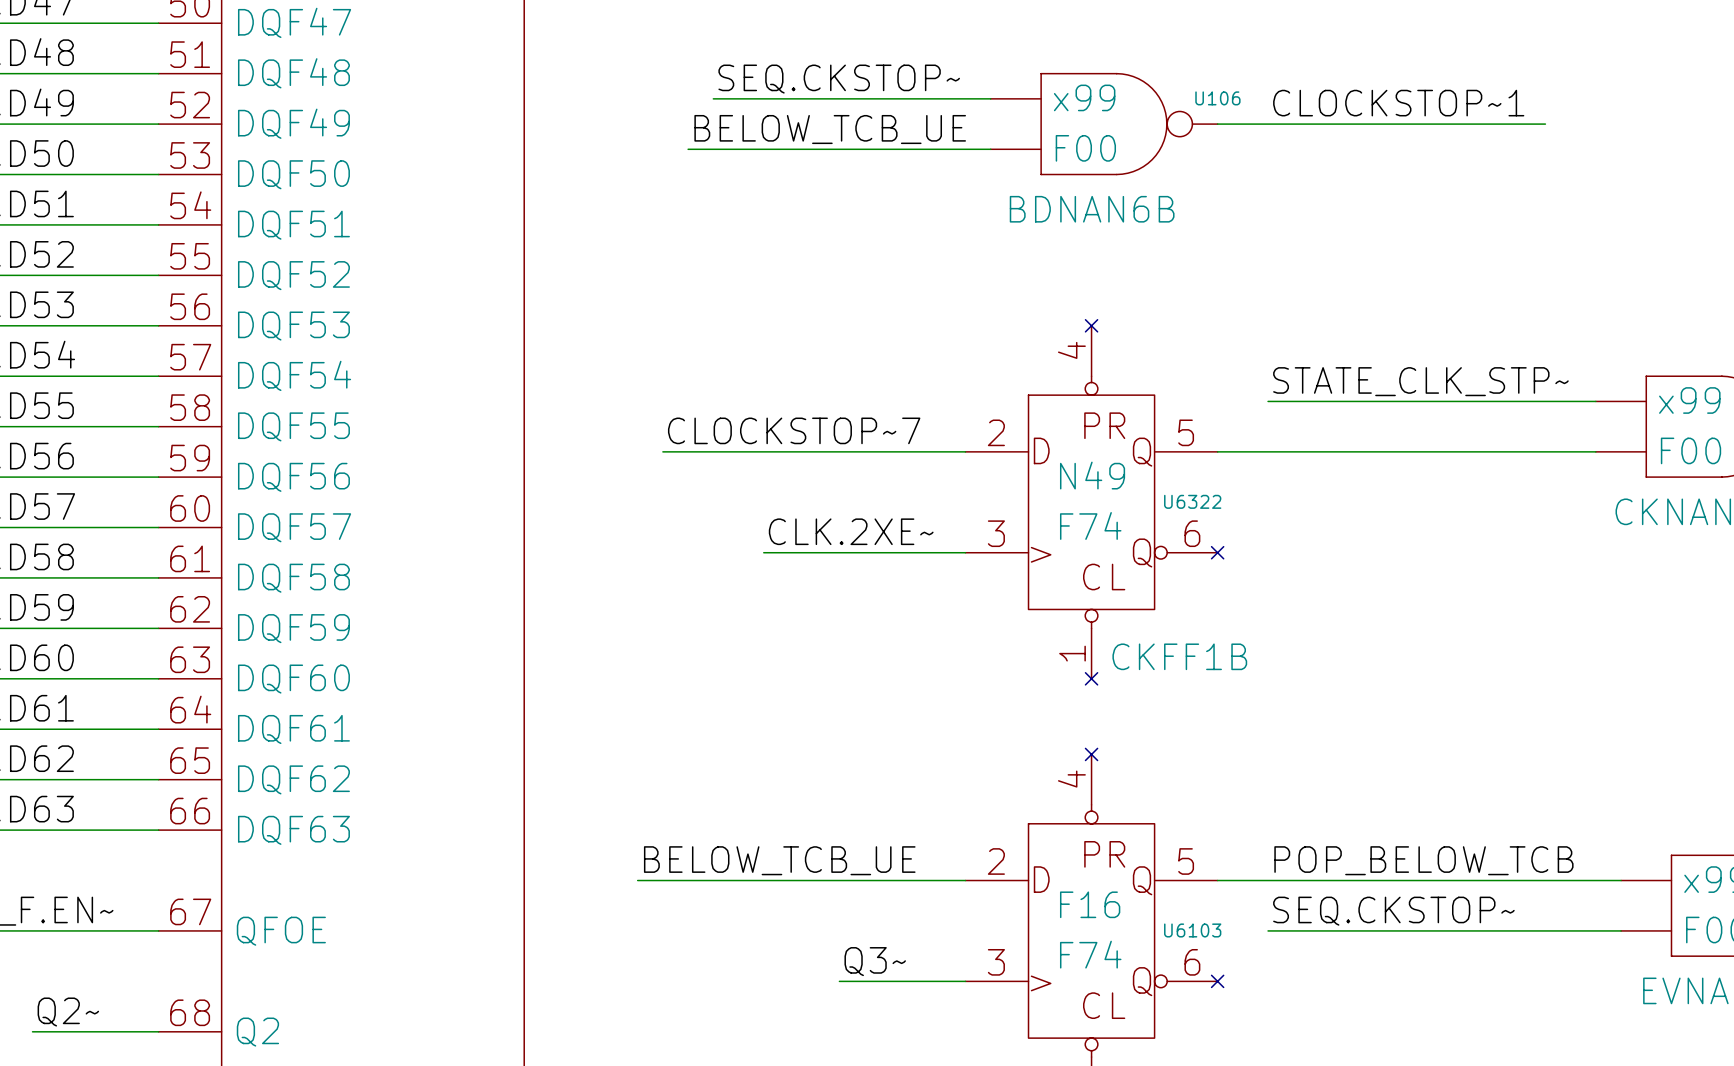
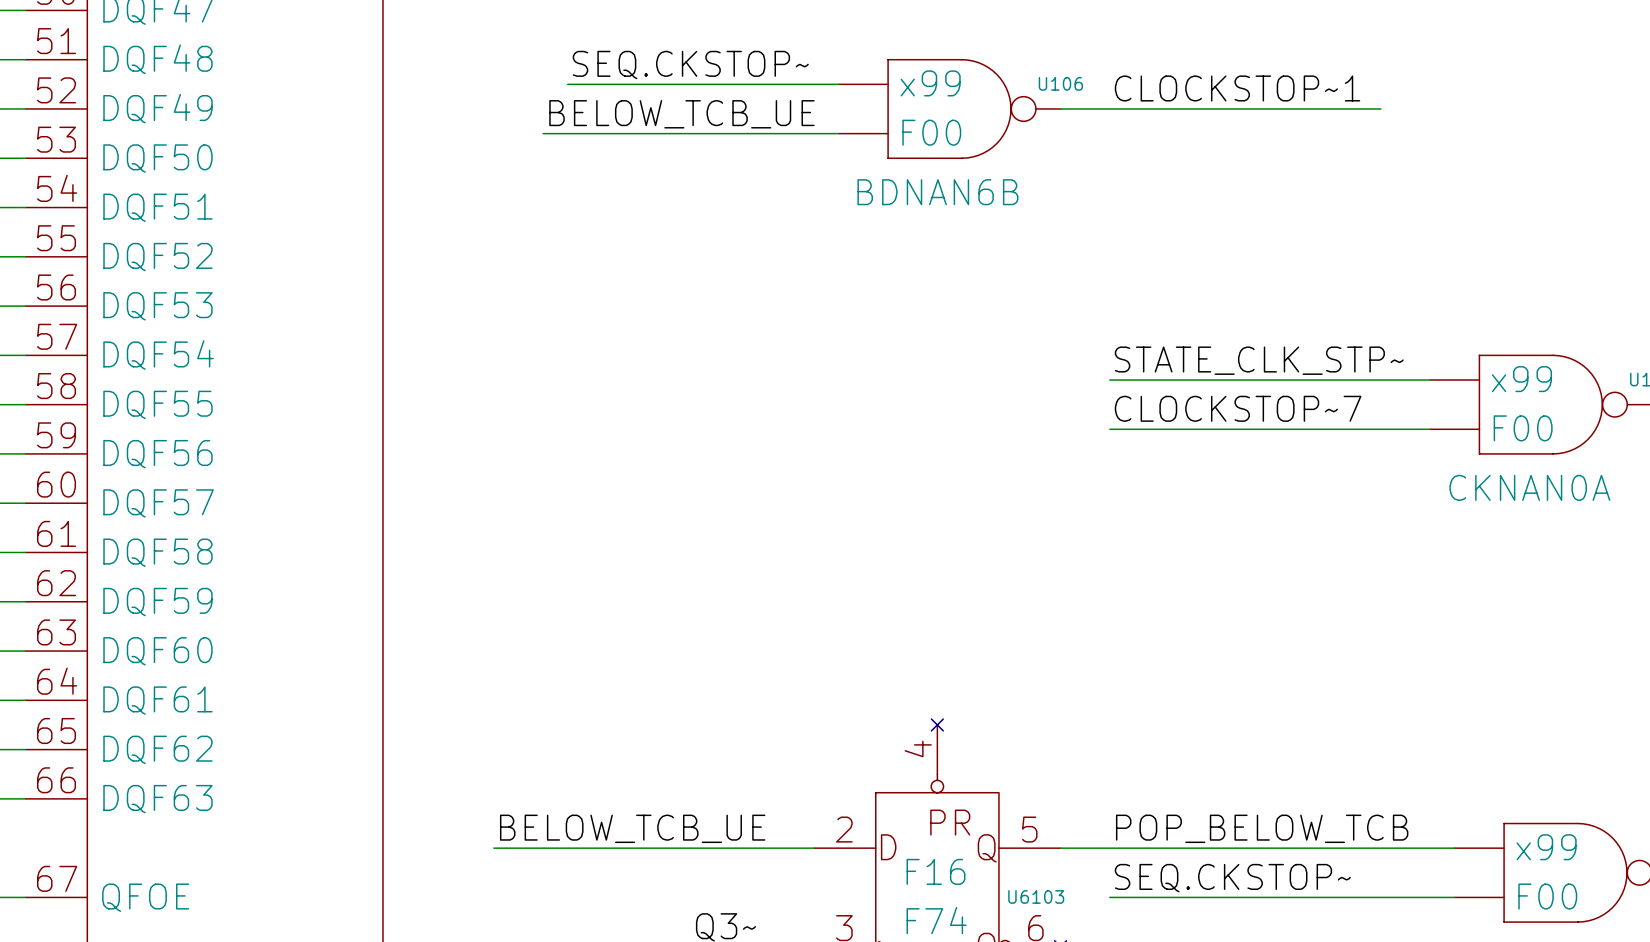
no-connect mark: (1091, 325) -> none
label: CLOCKSTOP~7 (794, 430) -> none
label: none -> CLOCKSTOP~7 (1238, 408)
wire: (662, 451) (965, 451) -> none
wire: (1217, 451) (1268, 451) -> none
U6322: F74 (1091, 502) -> none
label: CLK.2XE~ (851, 531) -> none
wire: (763, 552) (965, 552) -> none
no-connect mark: (1217, 552) -> none
no-connect mark: (1091, 678) -> none

